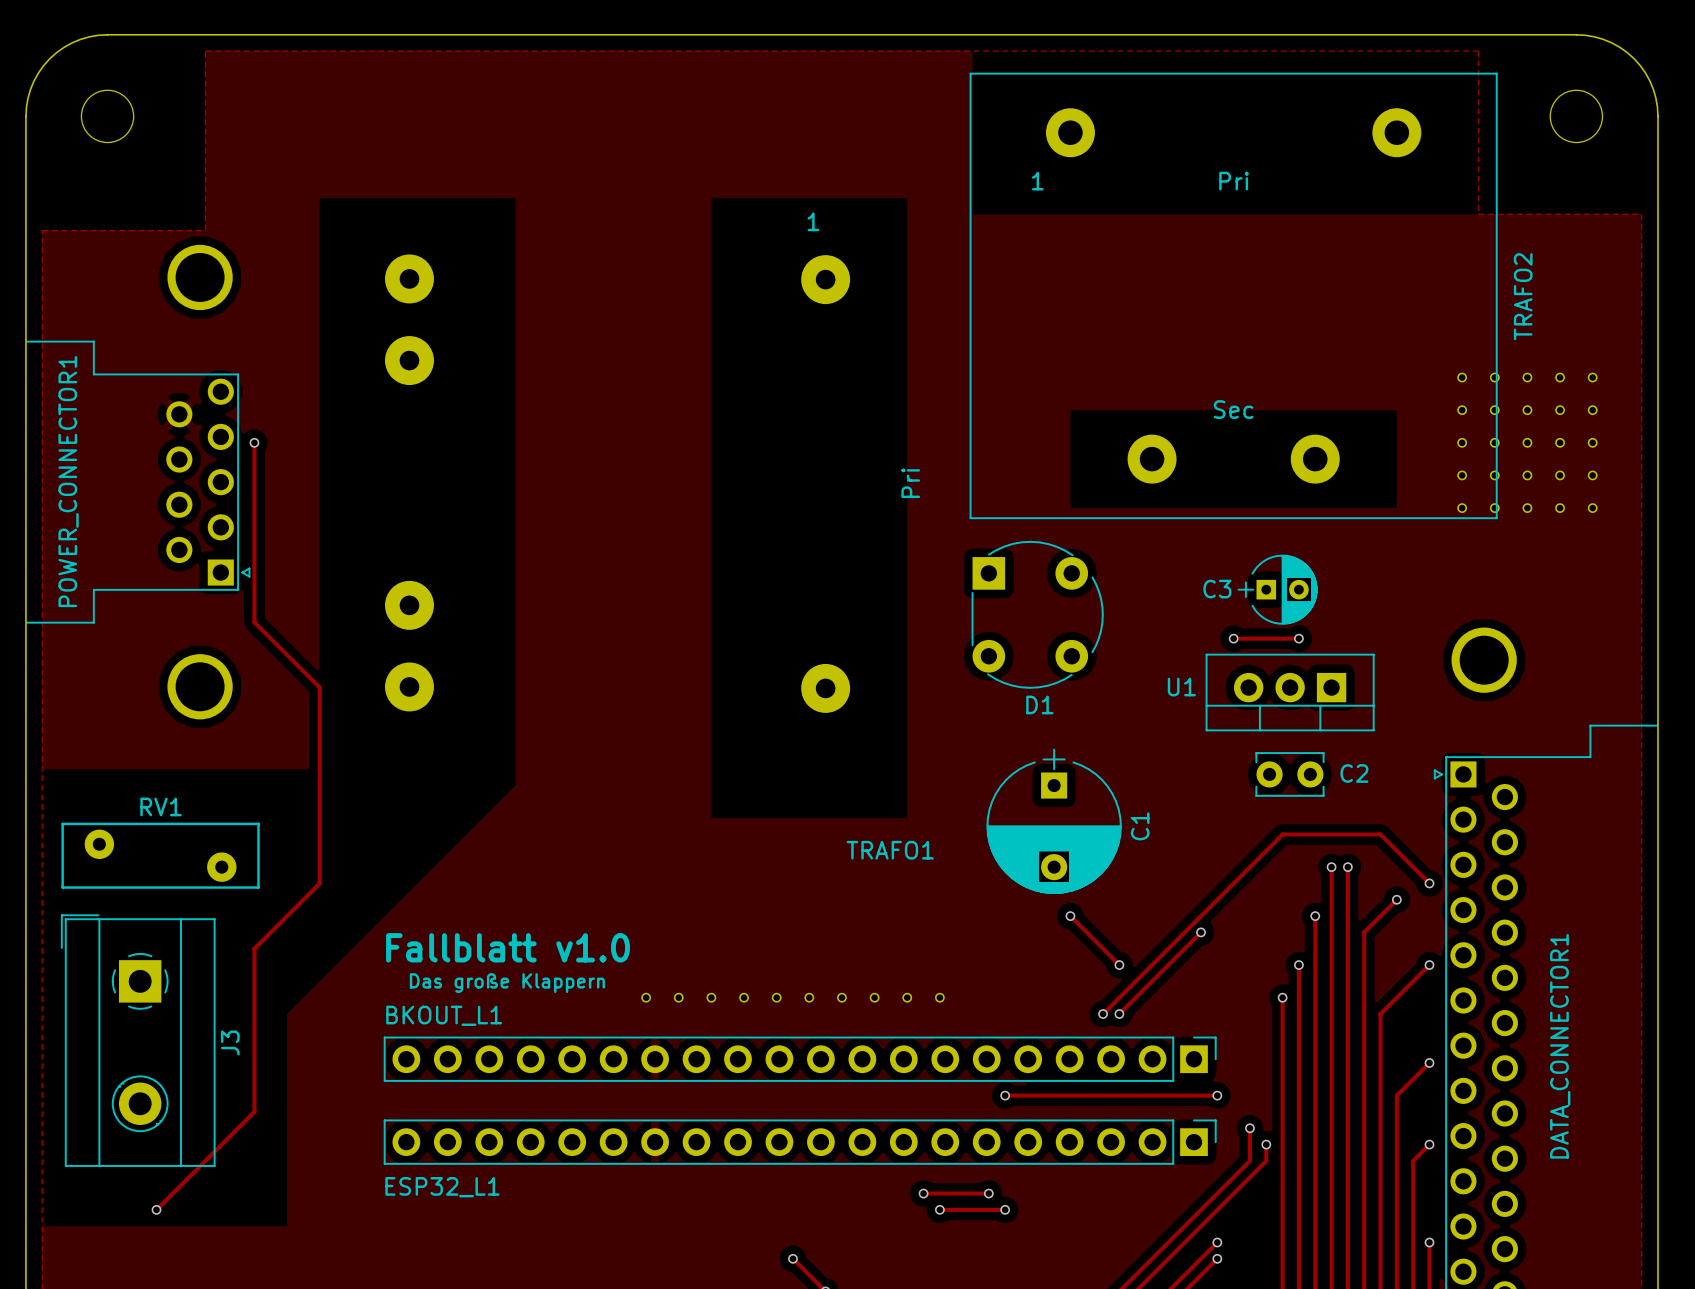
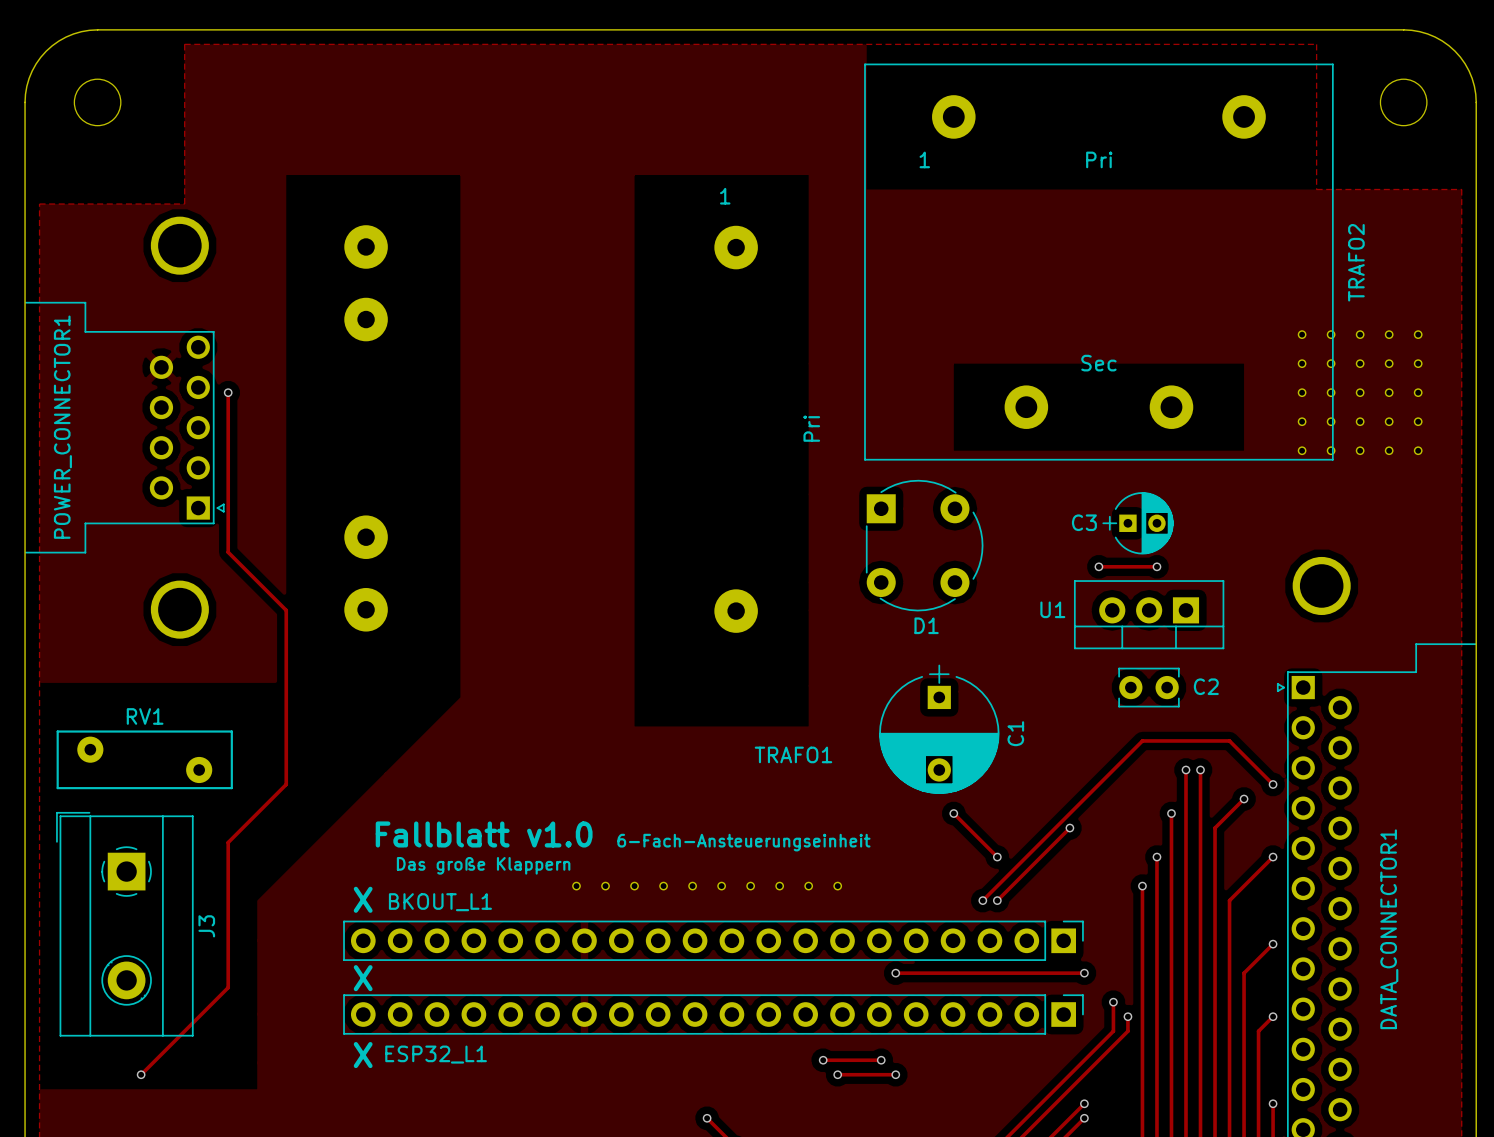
text position: Fallblatt v1.0 (507, 947) -> Fallblatt v1.0 (484, 834)
text: none -> 6-Fach-Ansteuerungseinheit (743, 842)
text position: Das große Klappern (507, 983) -> Das große Klappern (483, 865)
text: none -> X (363, 899)
BKOUT_L1 name position: BKOUT_L1 (444, 1015) -> BKOUT_L1 (440, 902)
text: none -> X (363, 978)
text: none -> X (363, 1055)
ESP32_L1 name position: ESP32_L1 (442, 1187) -> ESP32_L1 (436, 1054)

